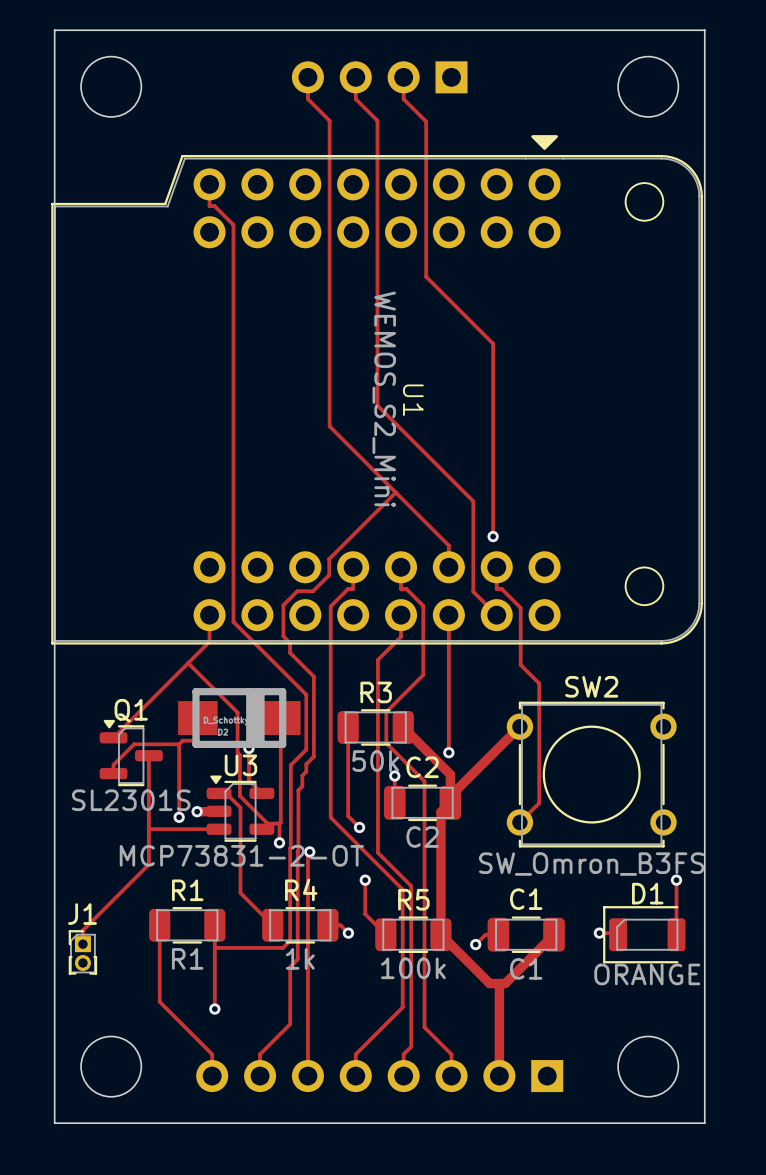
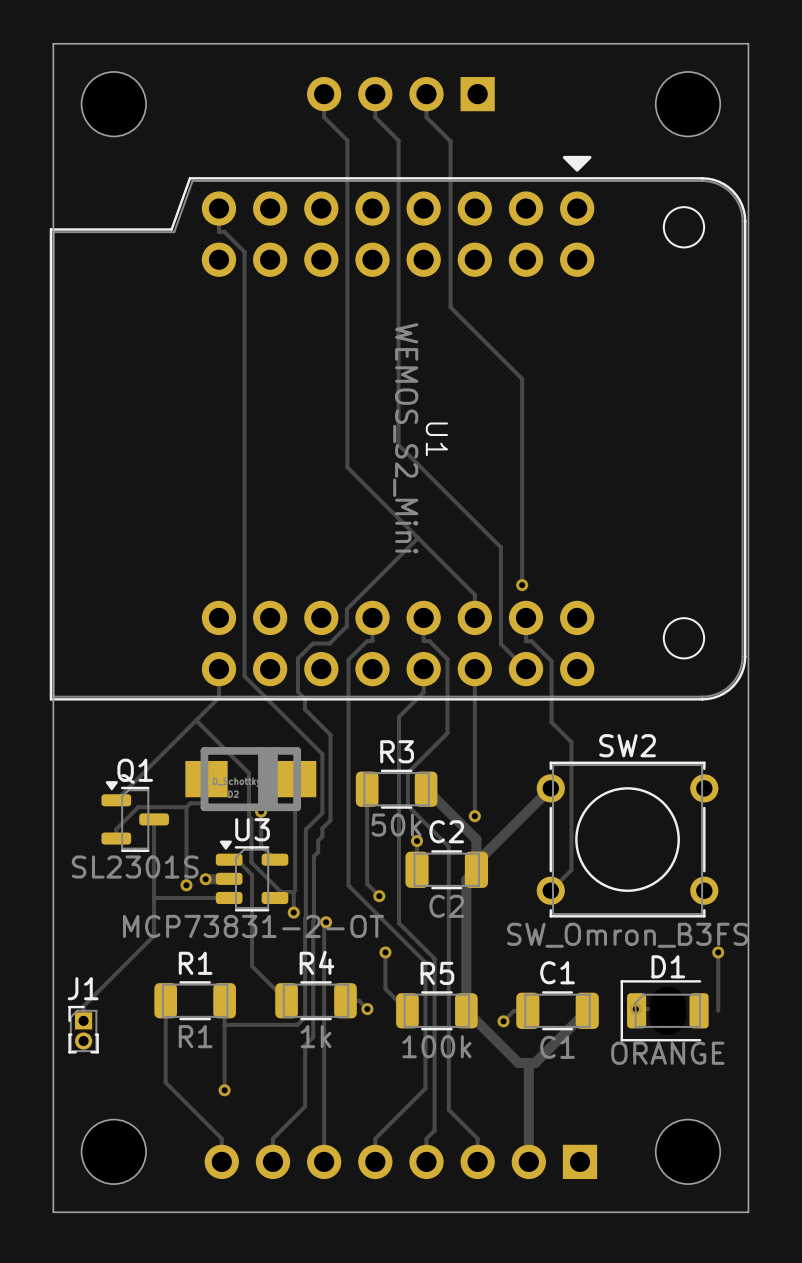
D1 position: (644, 934) -> (664, 1010)

